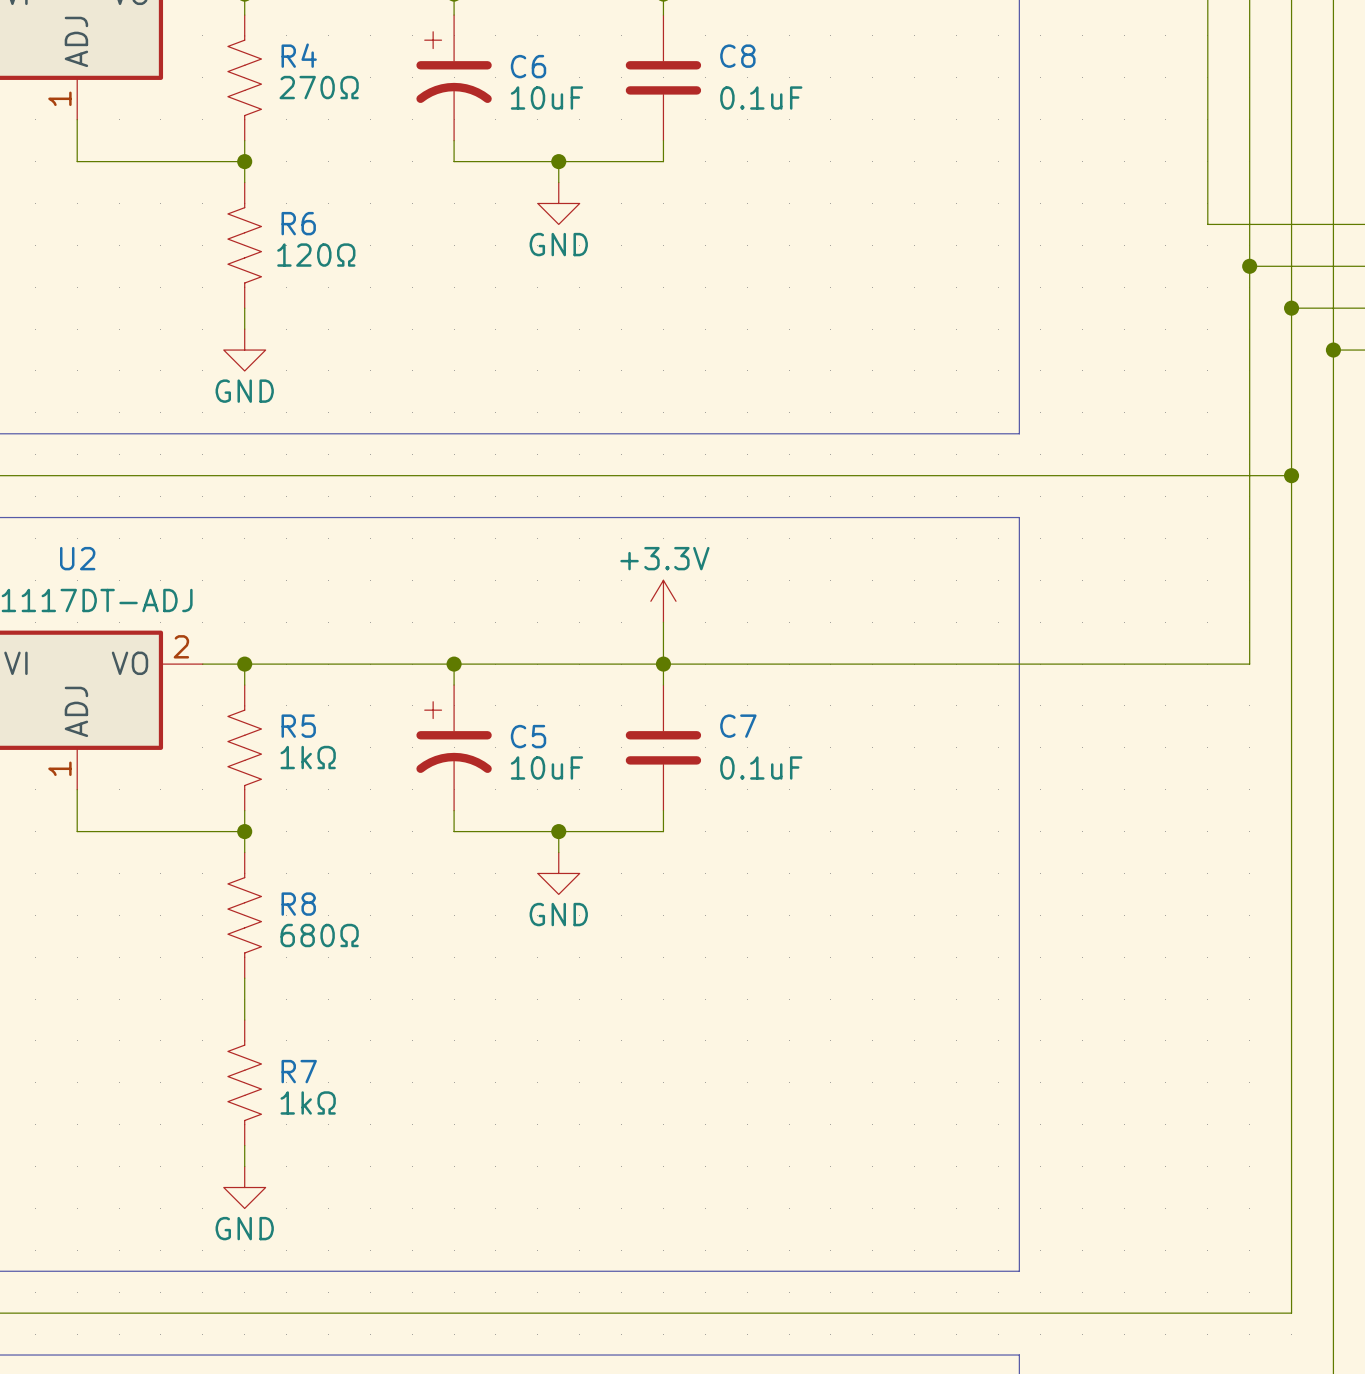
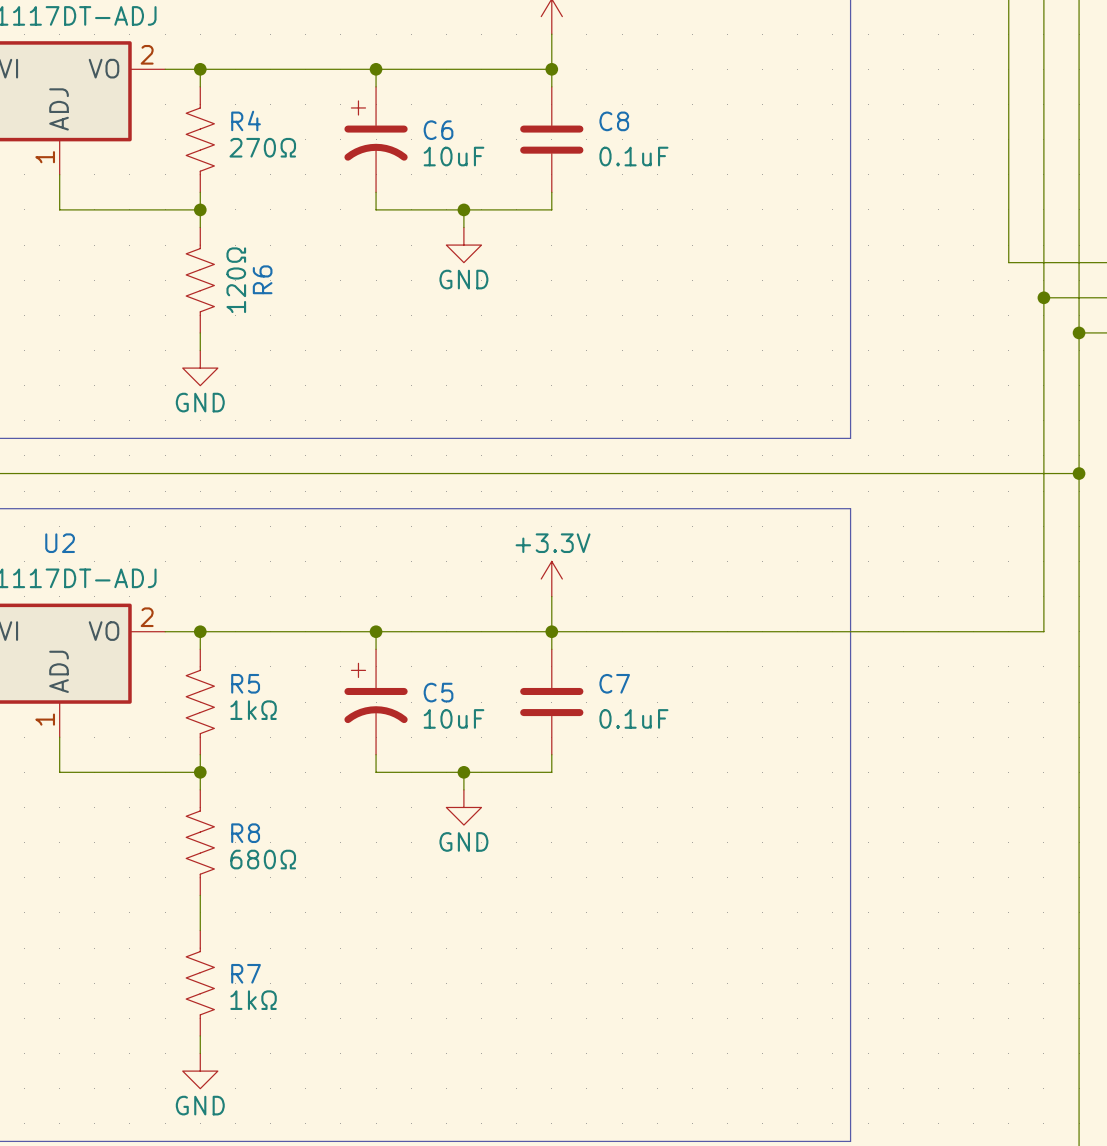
R6 name rotation: 0° (298, 223) -> 90° counterclockwise (262, 279)
R6 value rotation: 0° (316, 255) -> 90° counterclockwise (236, 280)

